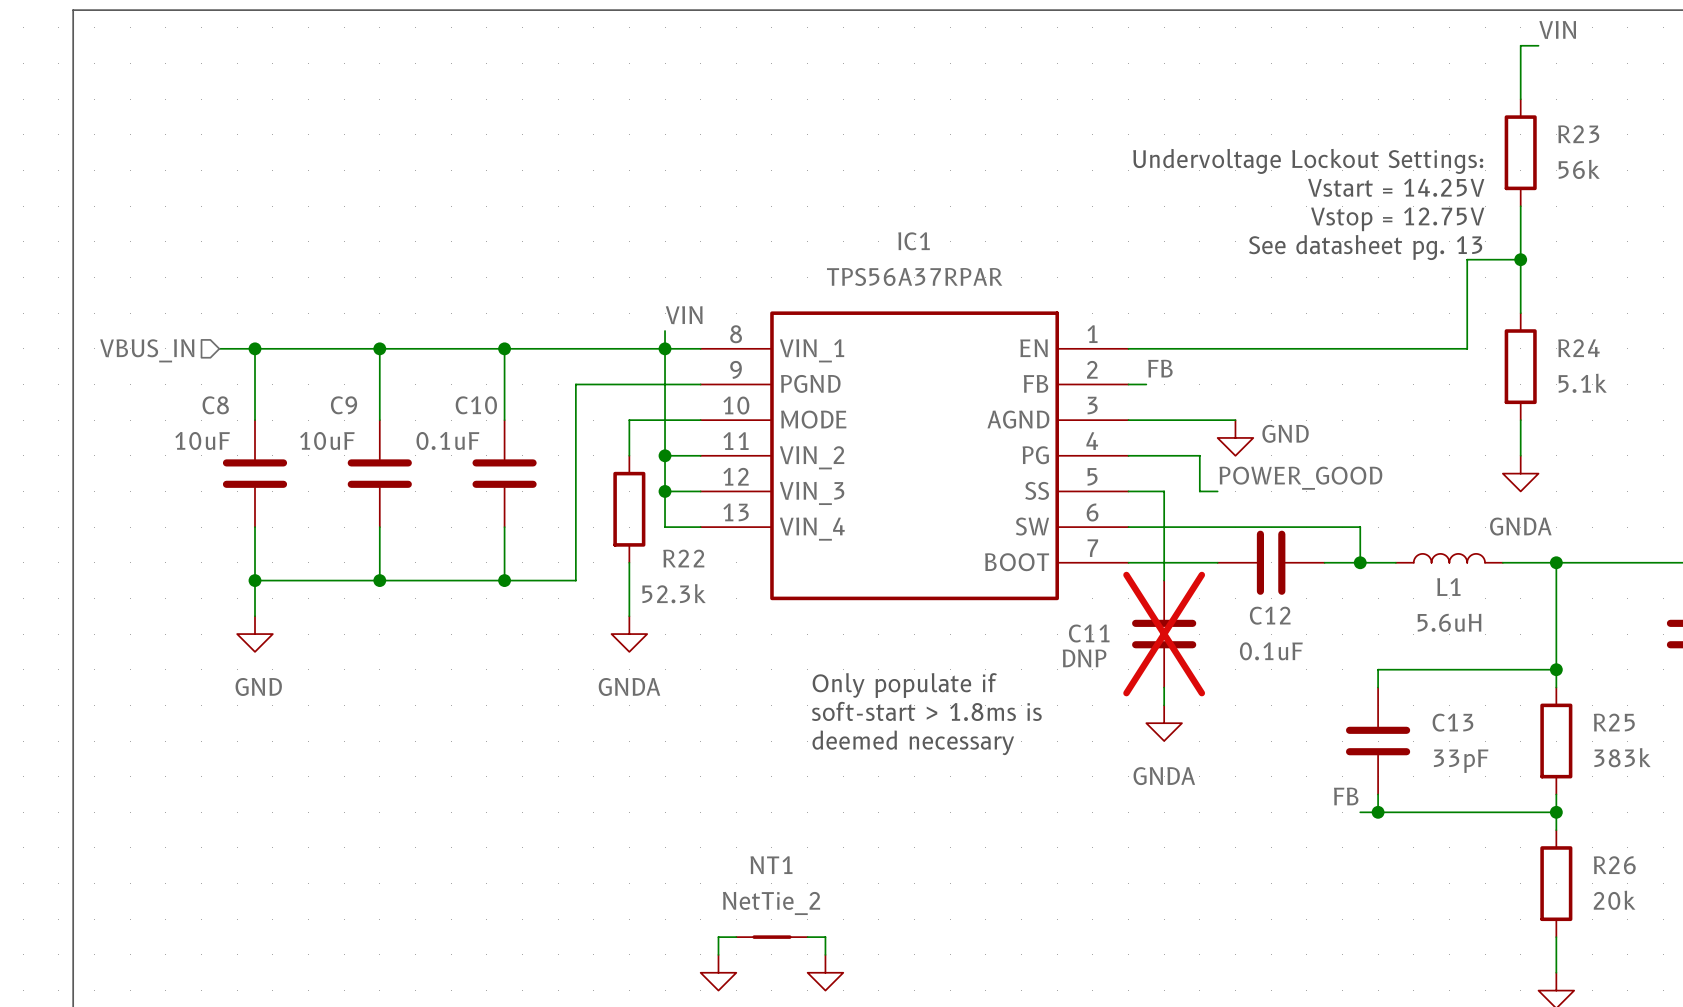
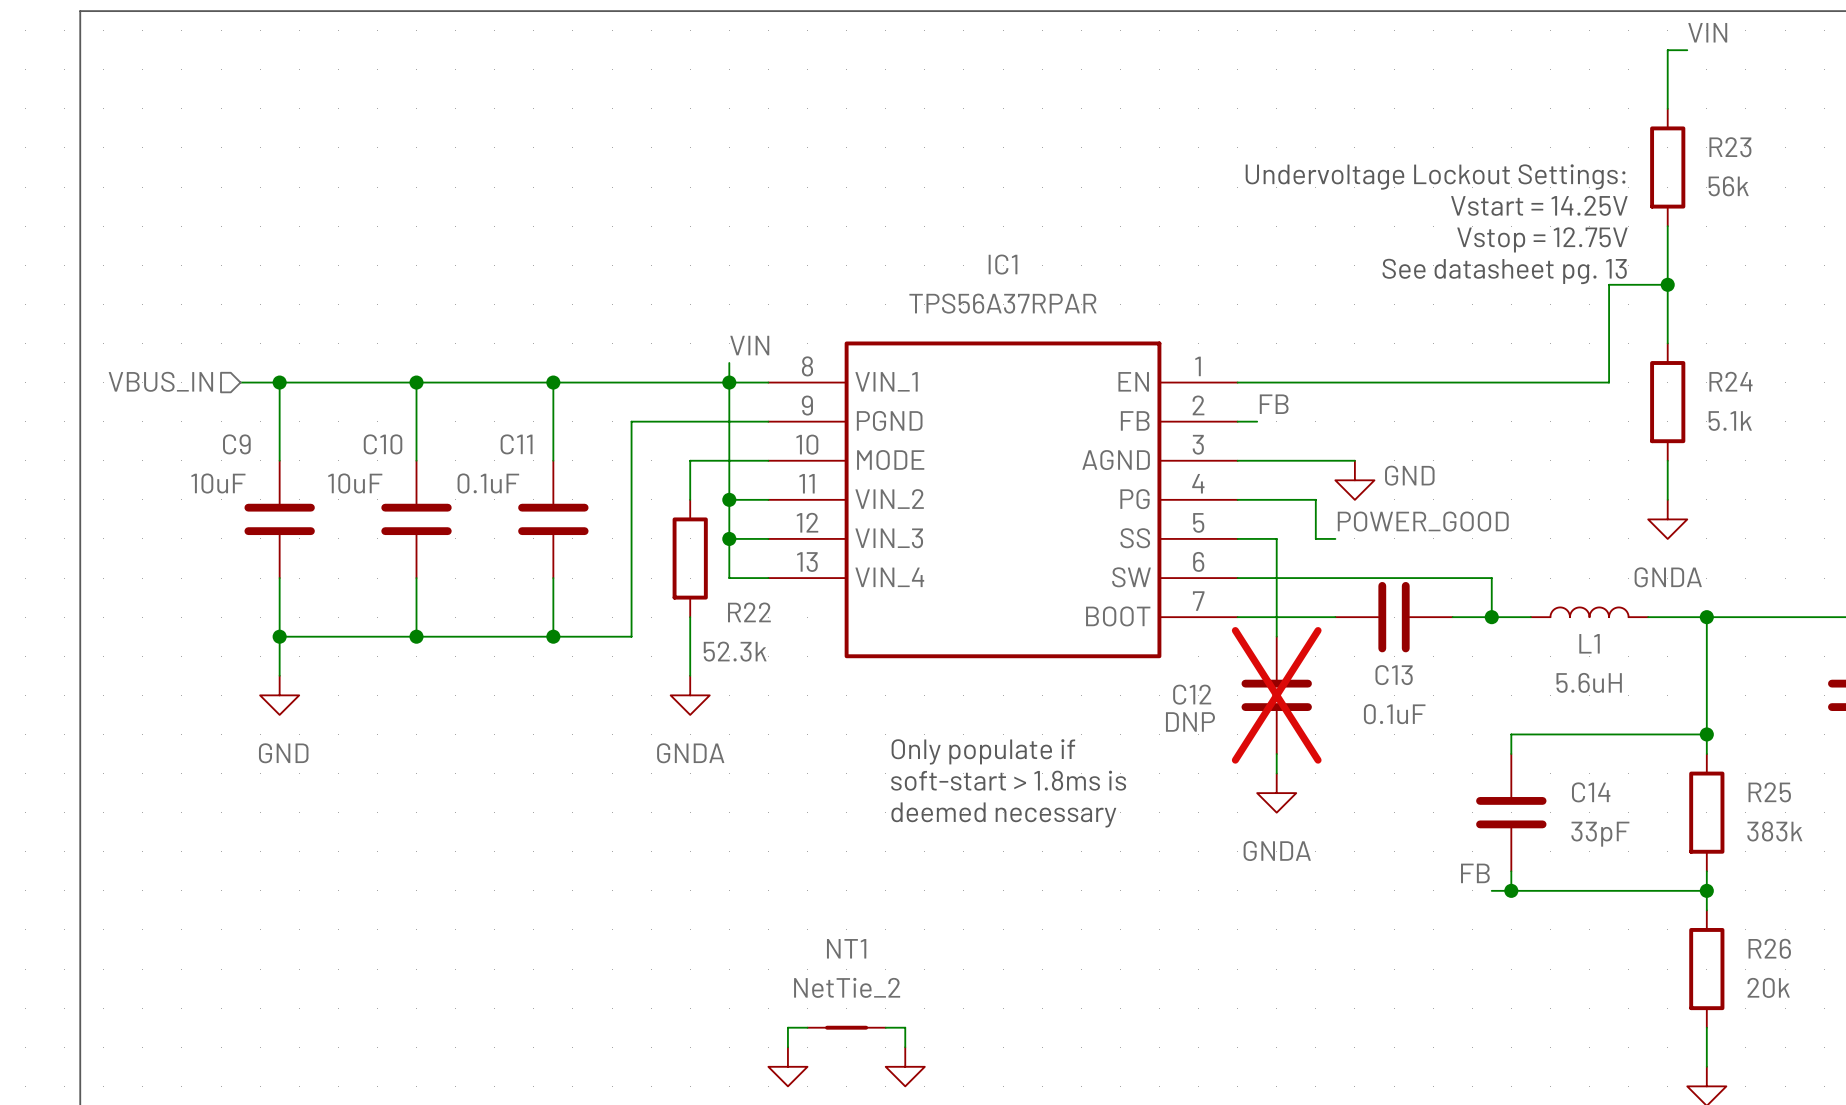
C8 name: C8 (215, 405) -> C9 (236, 444)
C9 name: C9 (344, 405) -> C10 (383, 444)
C10 name: C10 (476, 405) -> C11 (516, 444)
C12 name: C12 (1270, 615) -> C13 (1394, 675)
C11 name: C11 (1089, 633) -> C12 (1192, 694)
C13 name: C13 (1452, 722) -> C14 (1591, 792)

